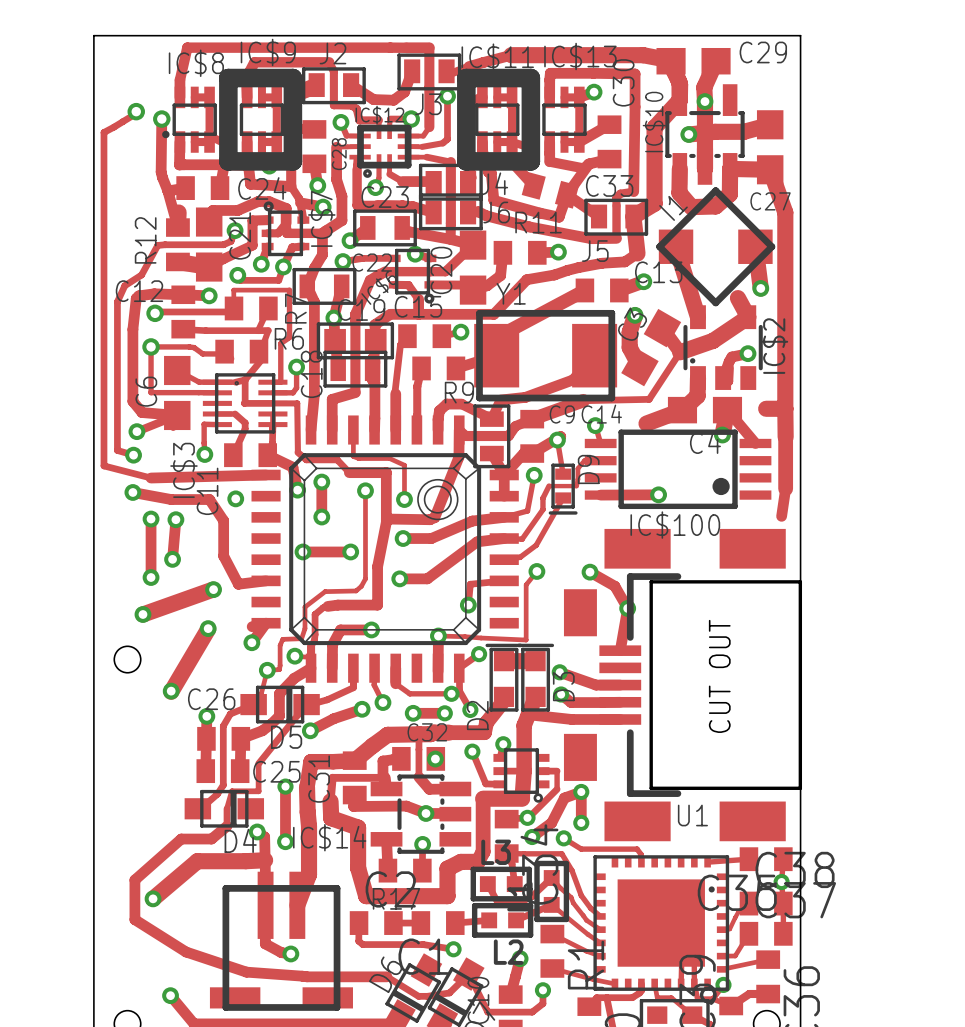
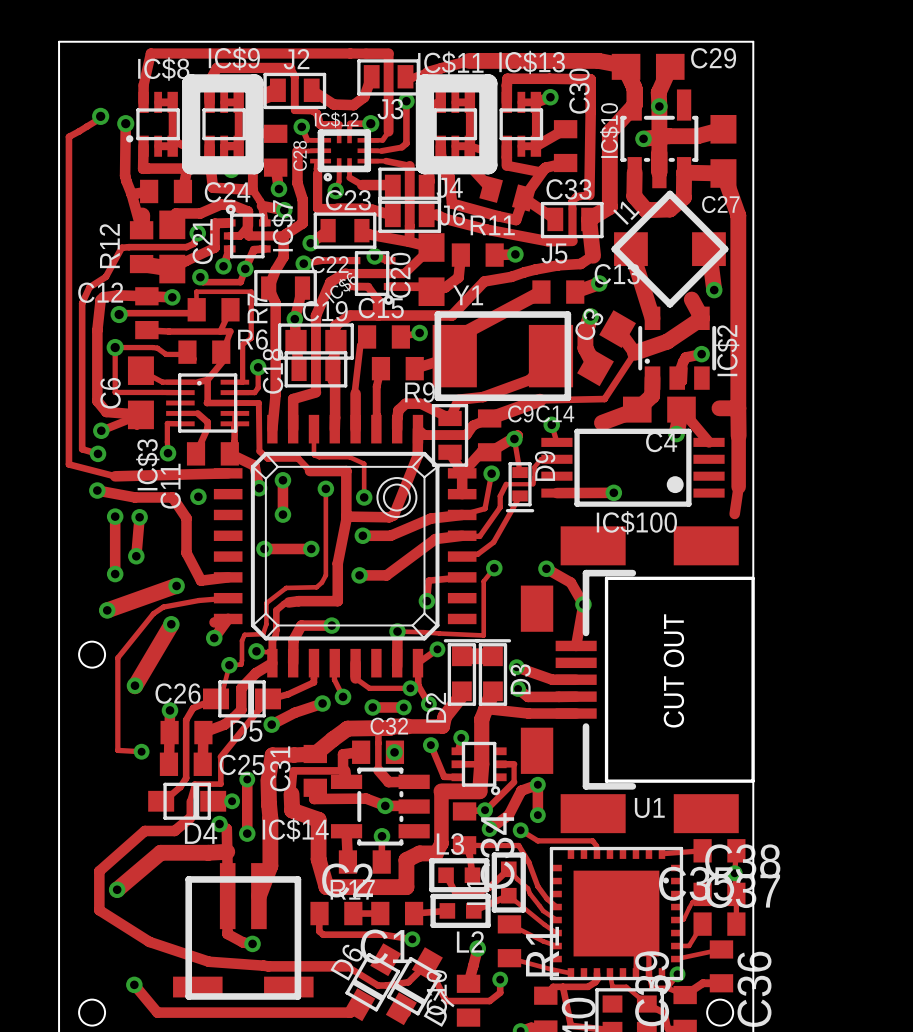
track: none -> (228, 598) (199, 600) (163, 607) (153, 613) (117, 657) (117, 750) (141, 751)
via: none -> (141, 751)
via: none -> (232, 801)

